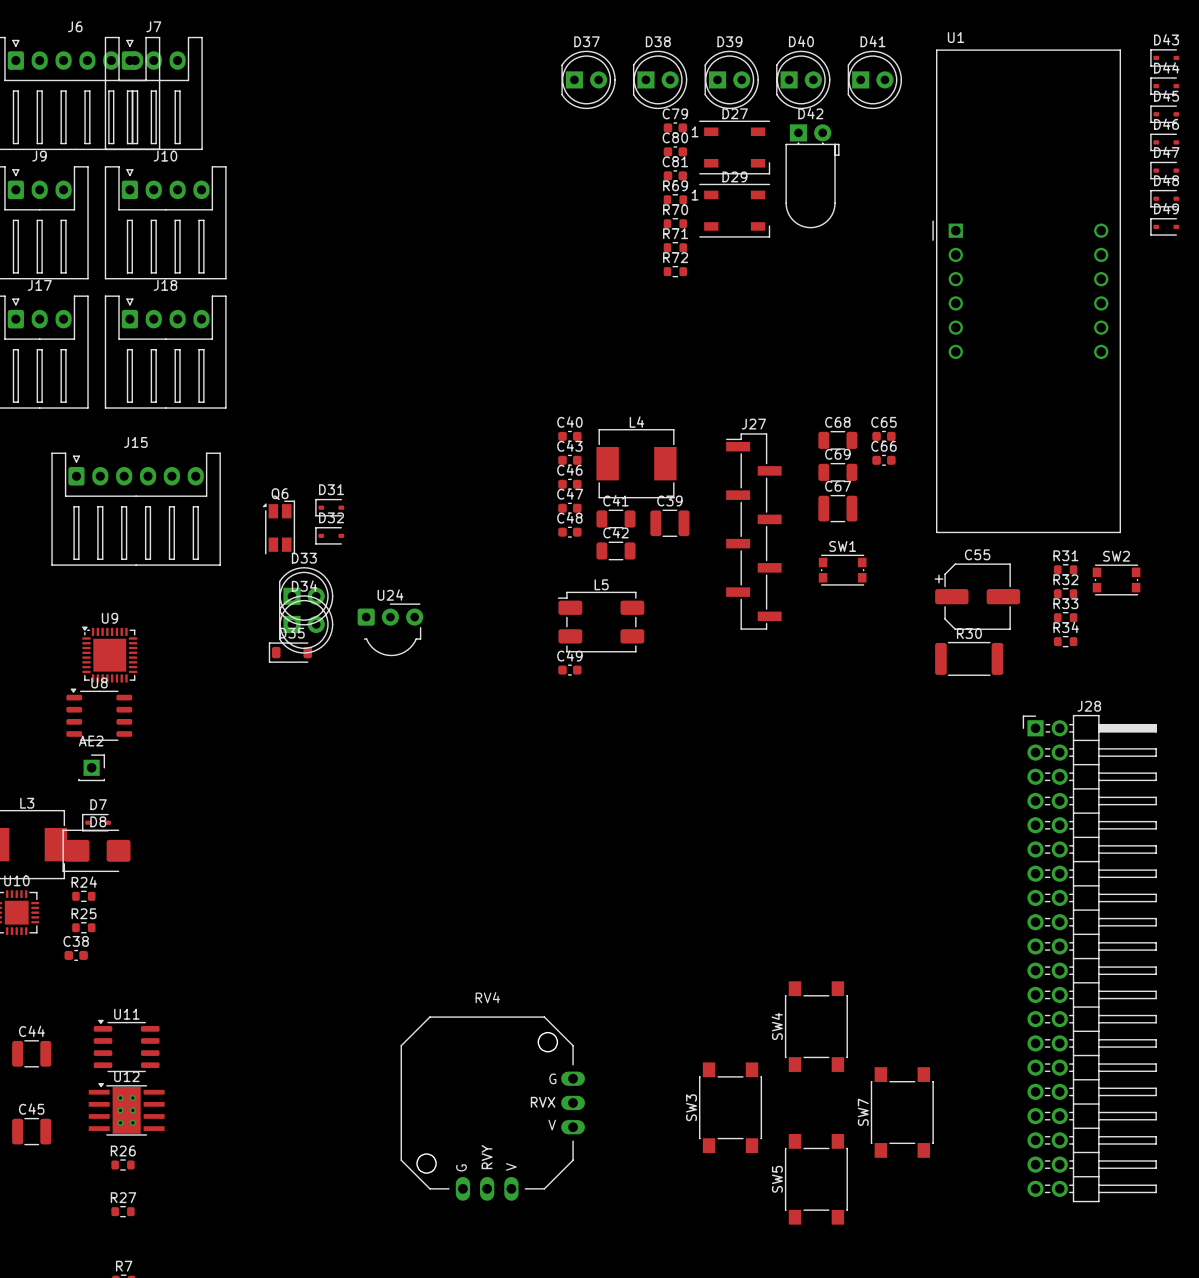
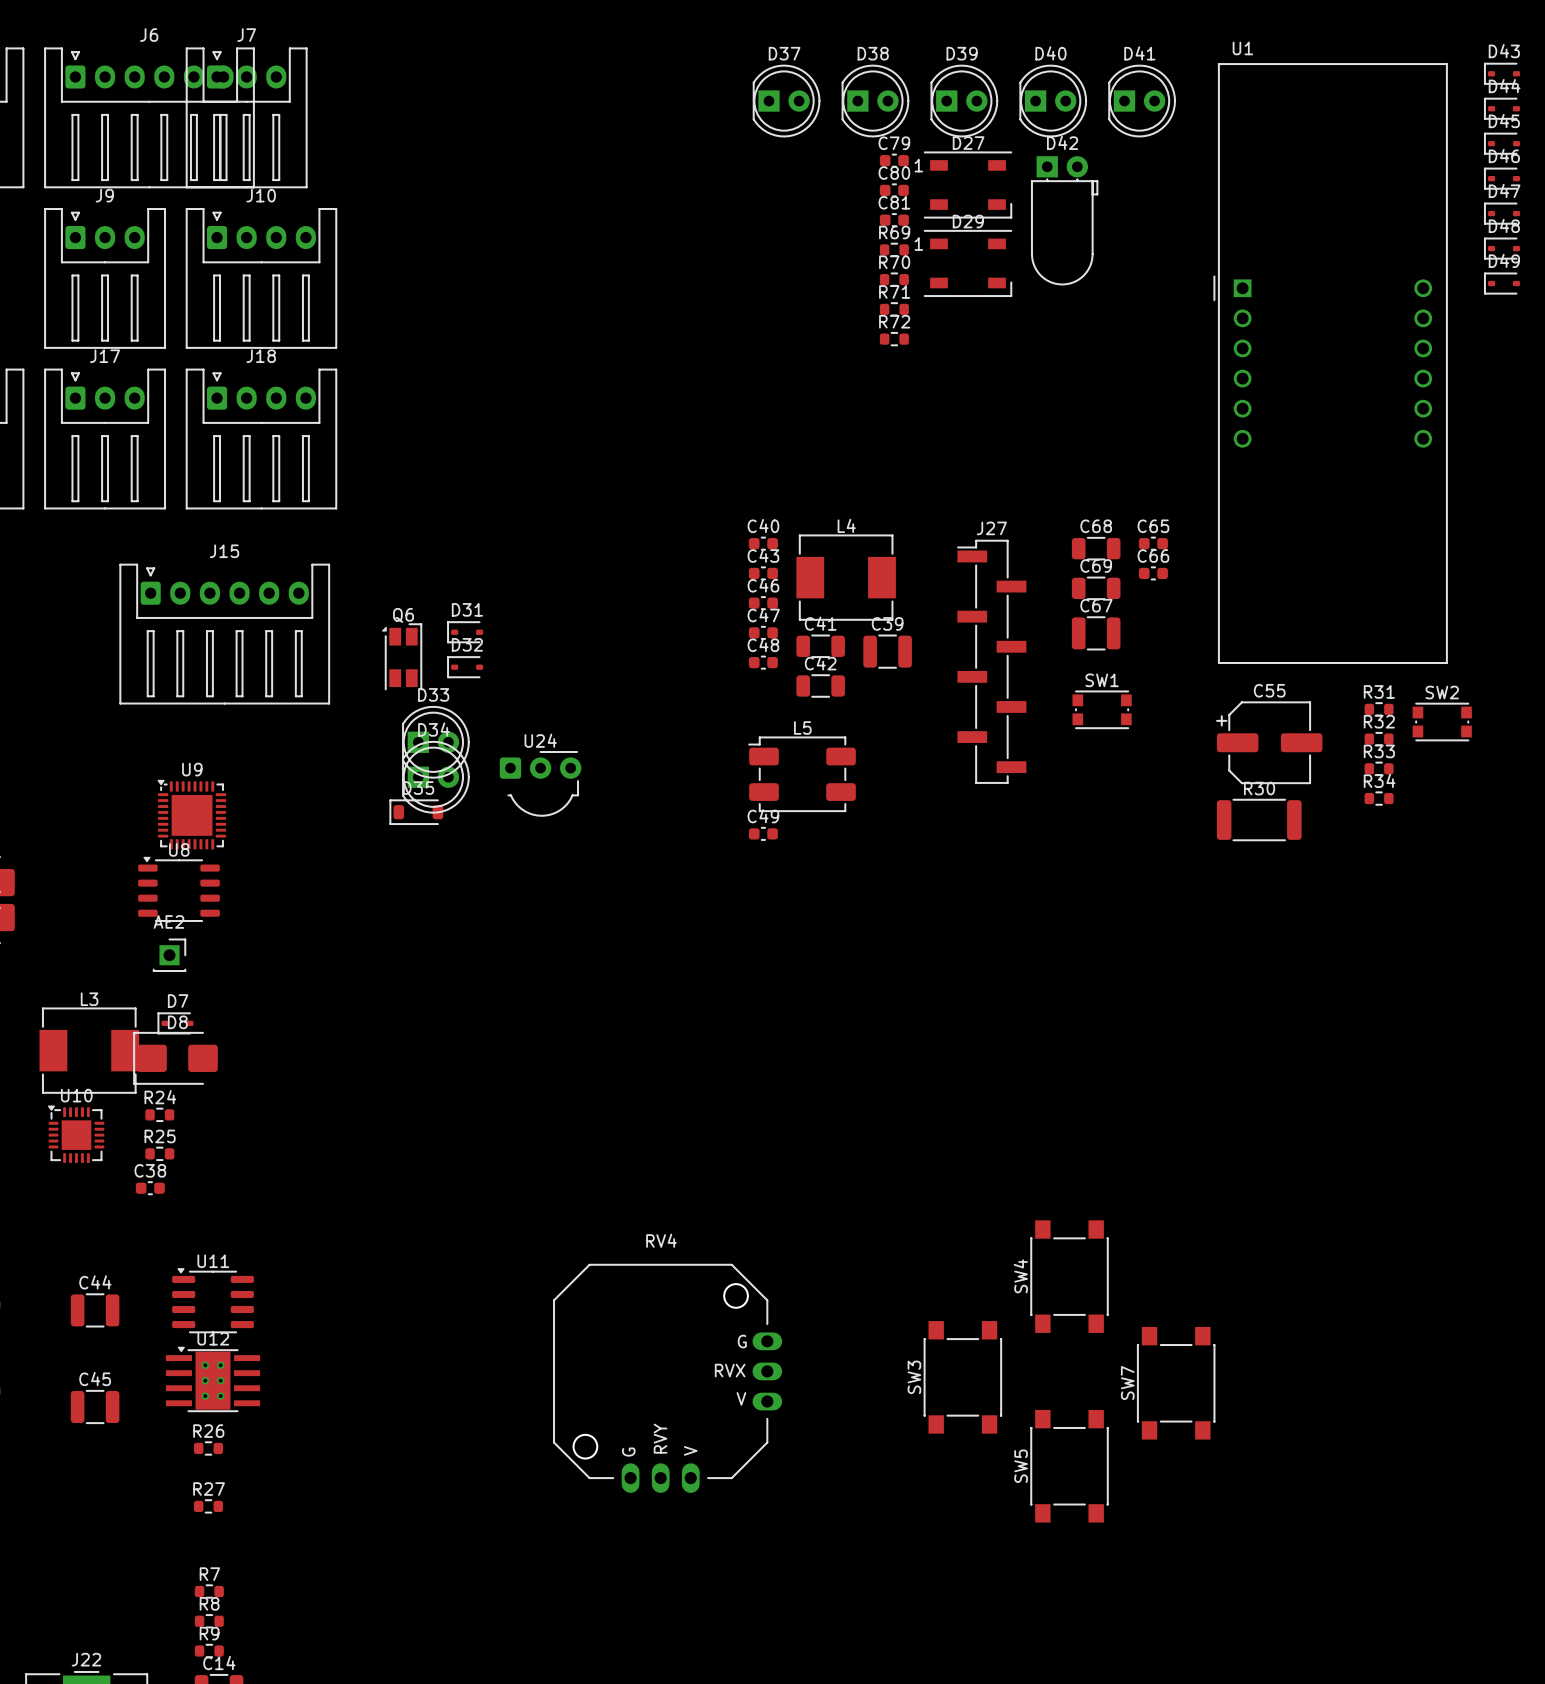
J28: (1089, 958) -> none

